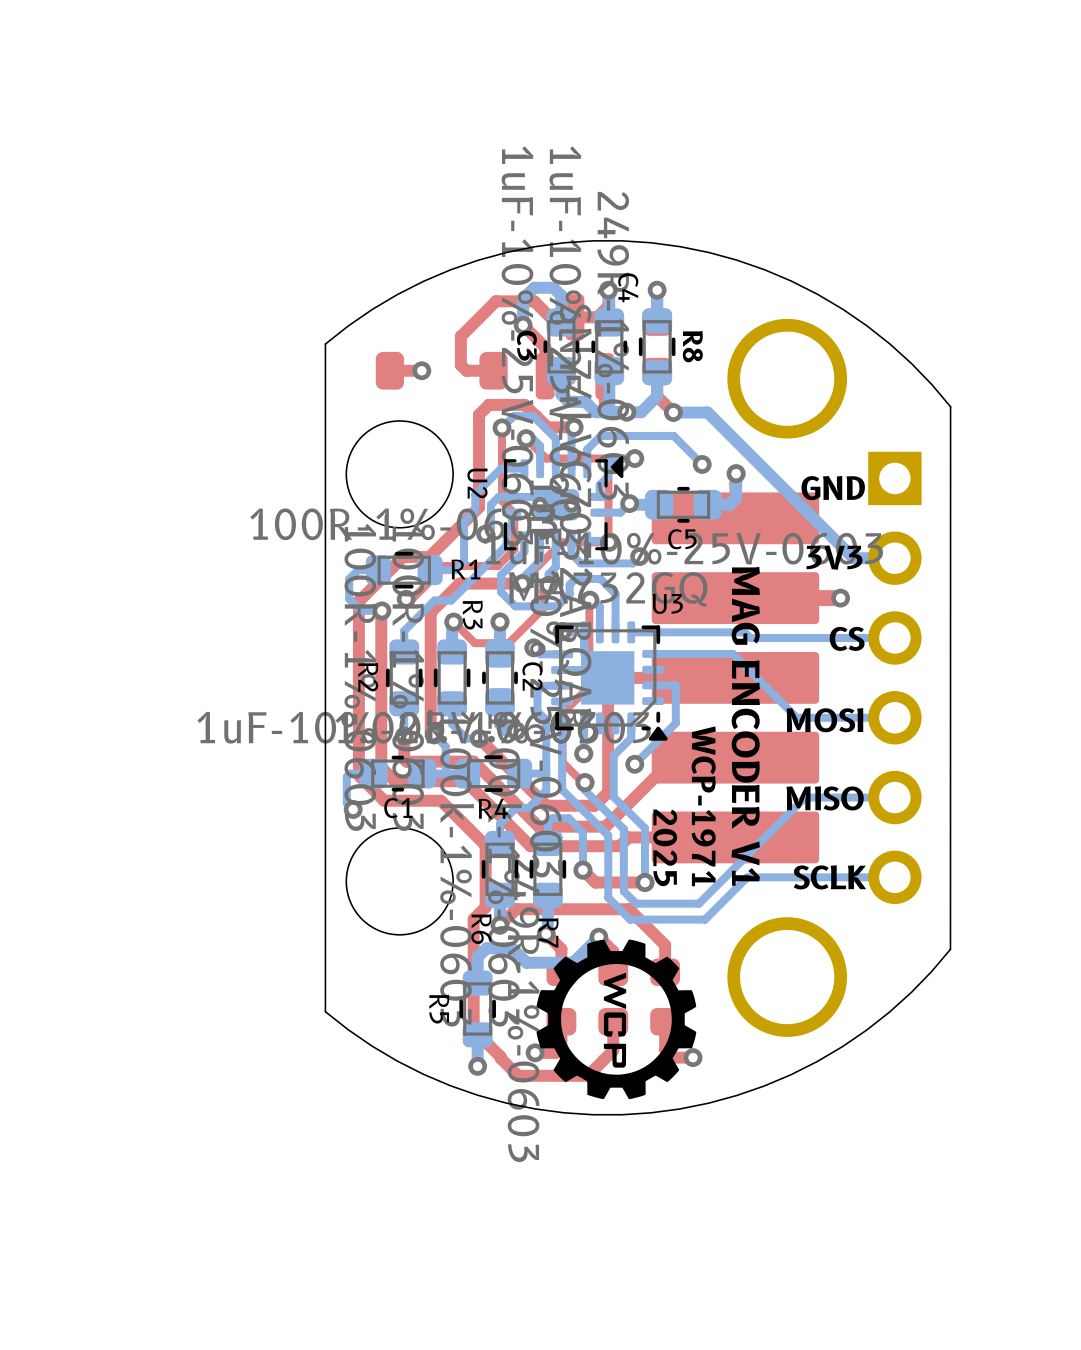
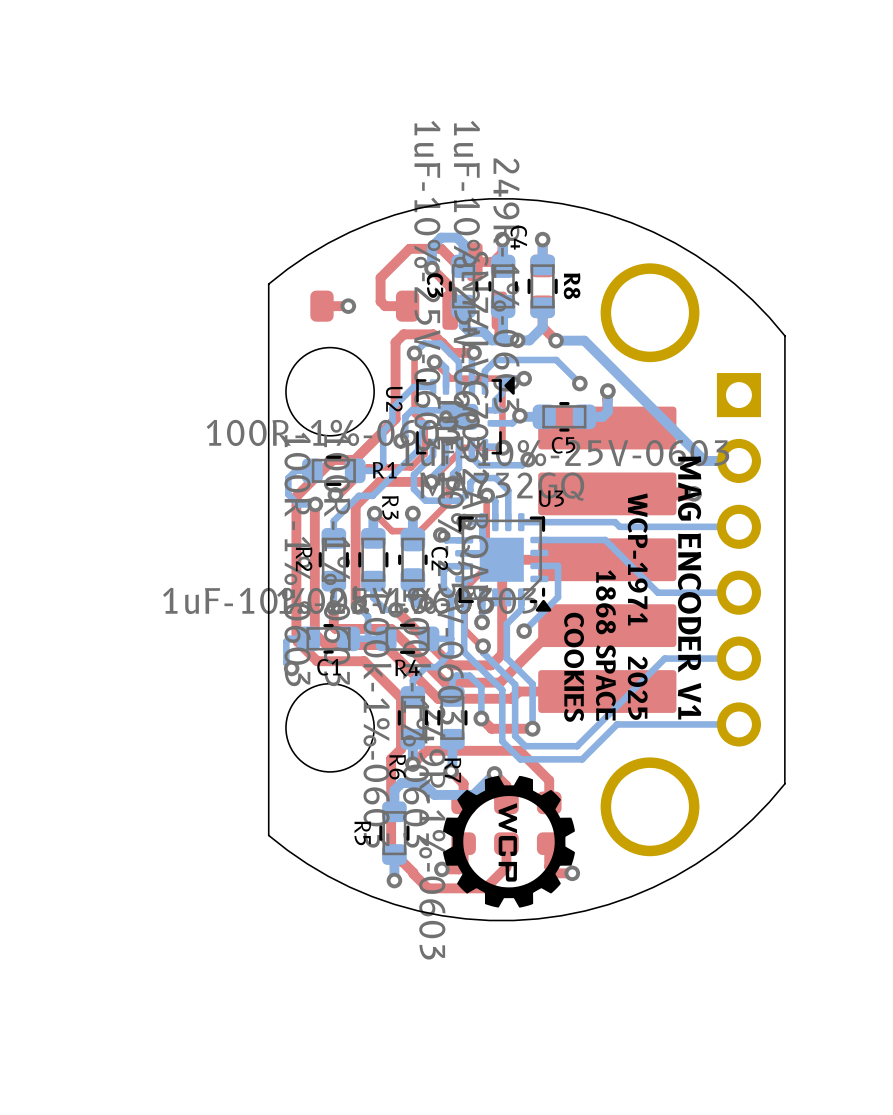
text: GND (833, 488) -> none
text: 3V3 (834, 557) -> none
text: CS (847, 638) -> none
text: MOSI (824, 720) -> none
text: MAG ENCODER V1 (745, 726) -> 1868 SPACE (605, 645)
text: none -> WCP-1971 2025 (637, 606)
text: MISO (825, 798) -> none
text: WCP-1971 (703, 806) -> none
text: none -> COOKIES (574, 667)
text: 2025 (665, 847) -> none
text: SCLK (829, 877) -> MAG ENCODER V1 (689, 587)

